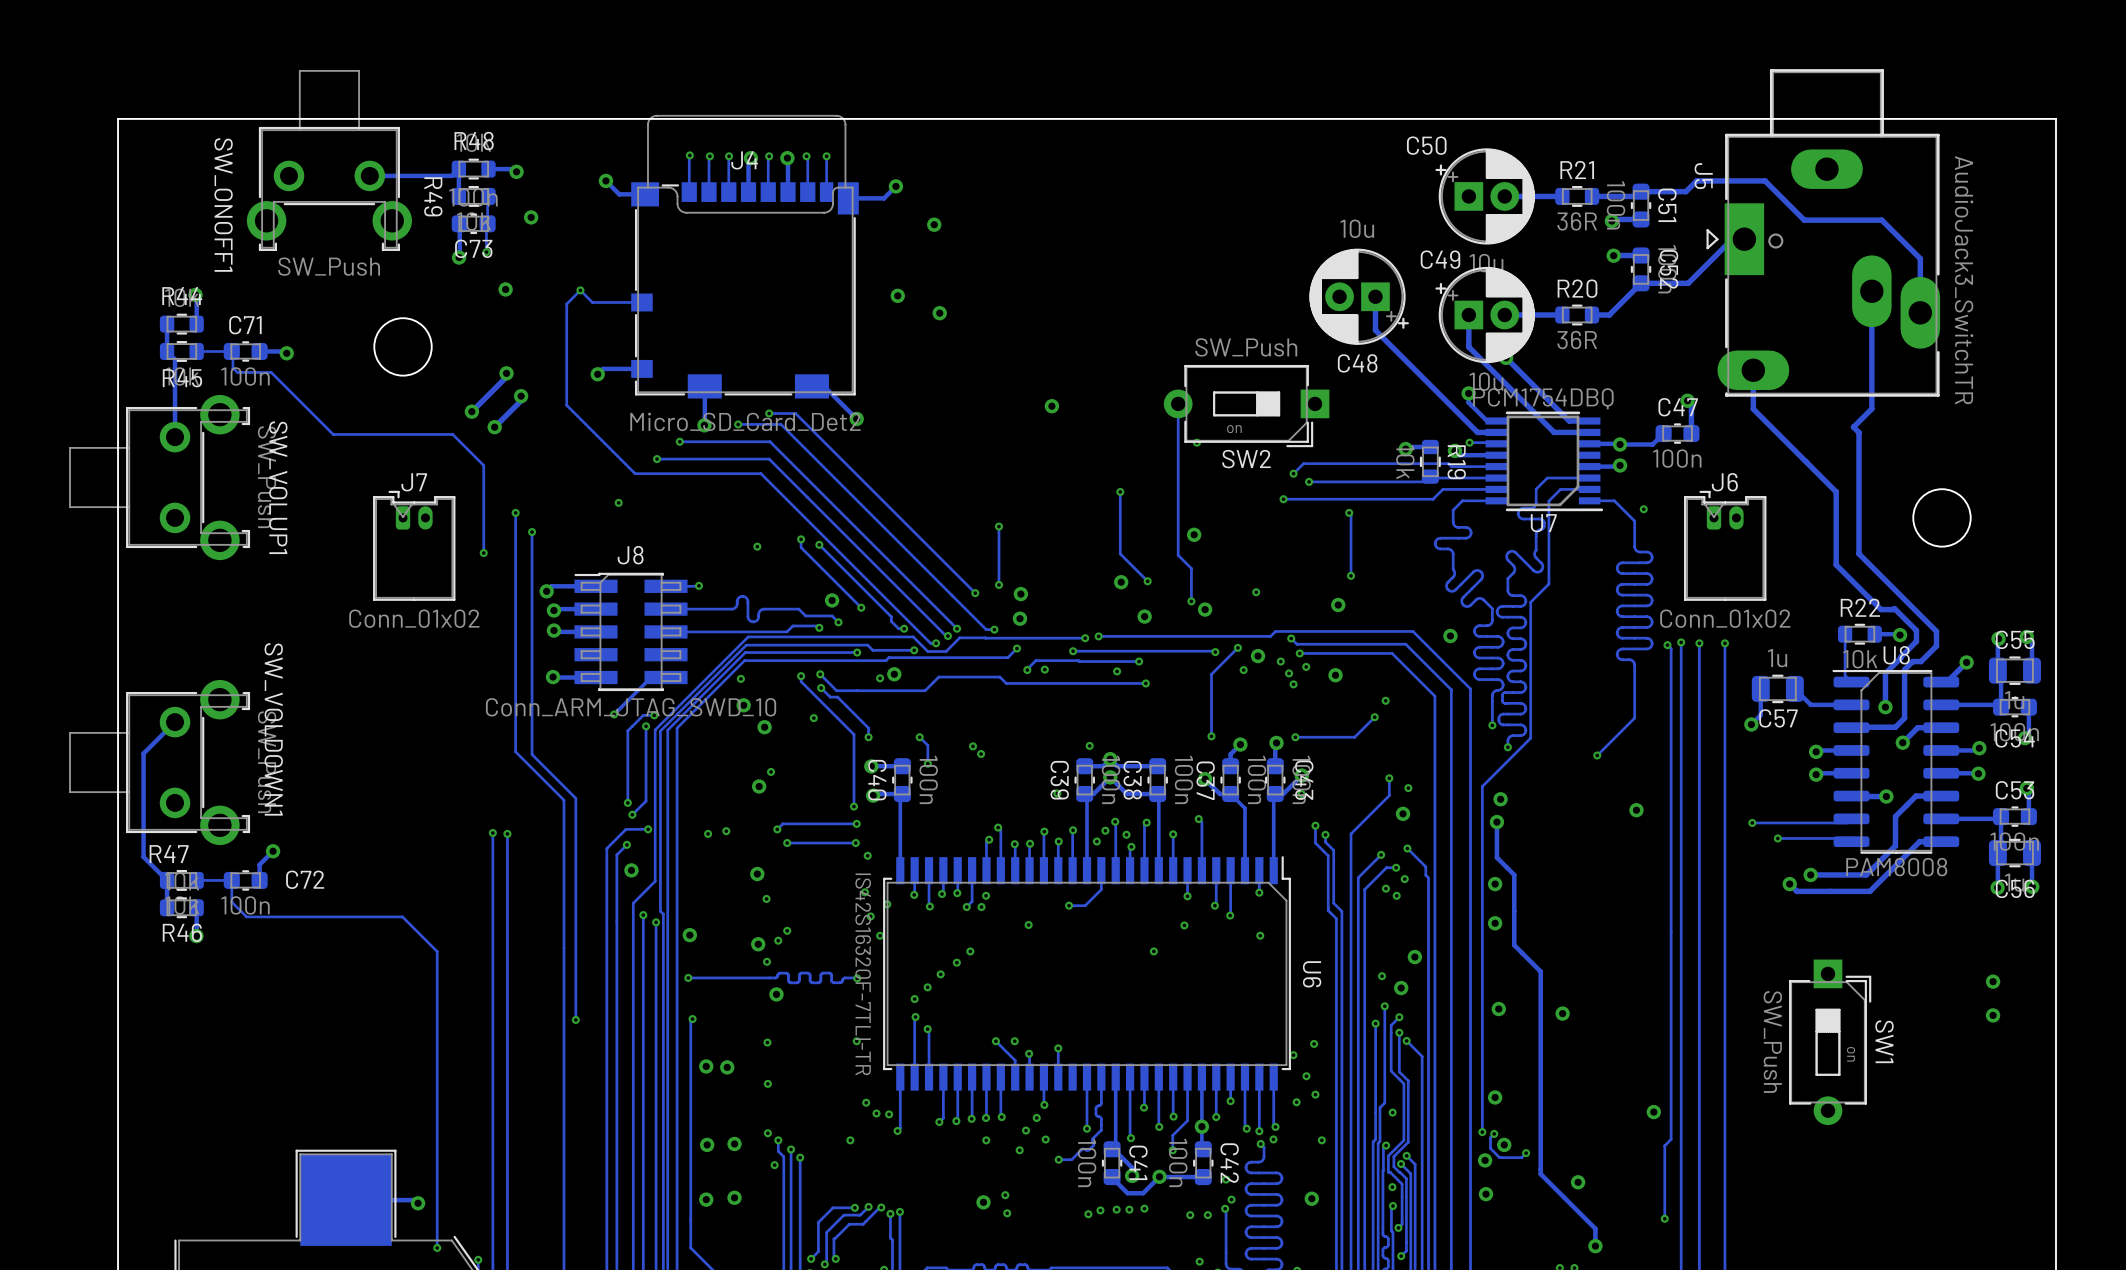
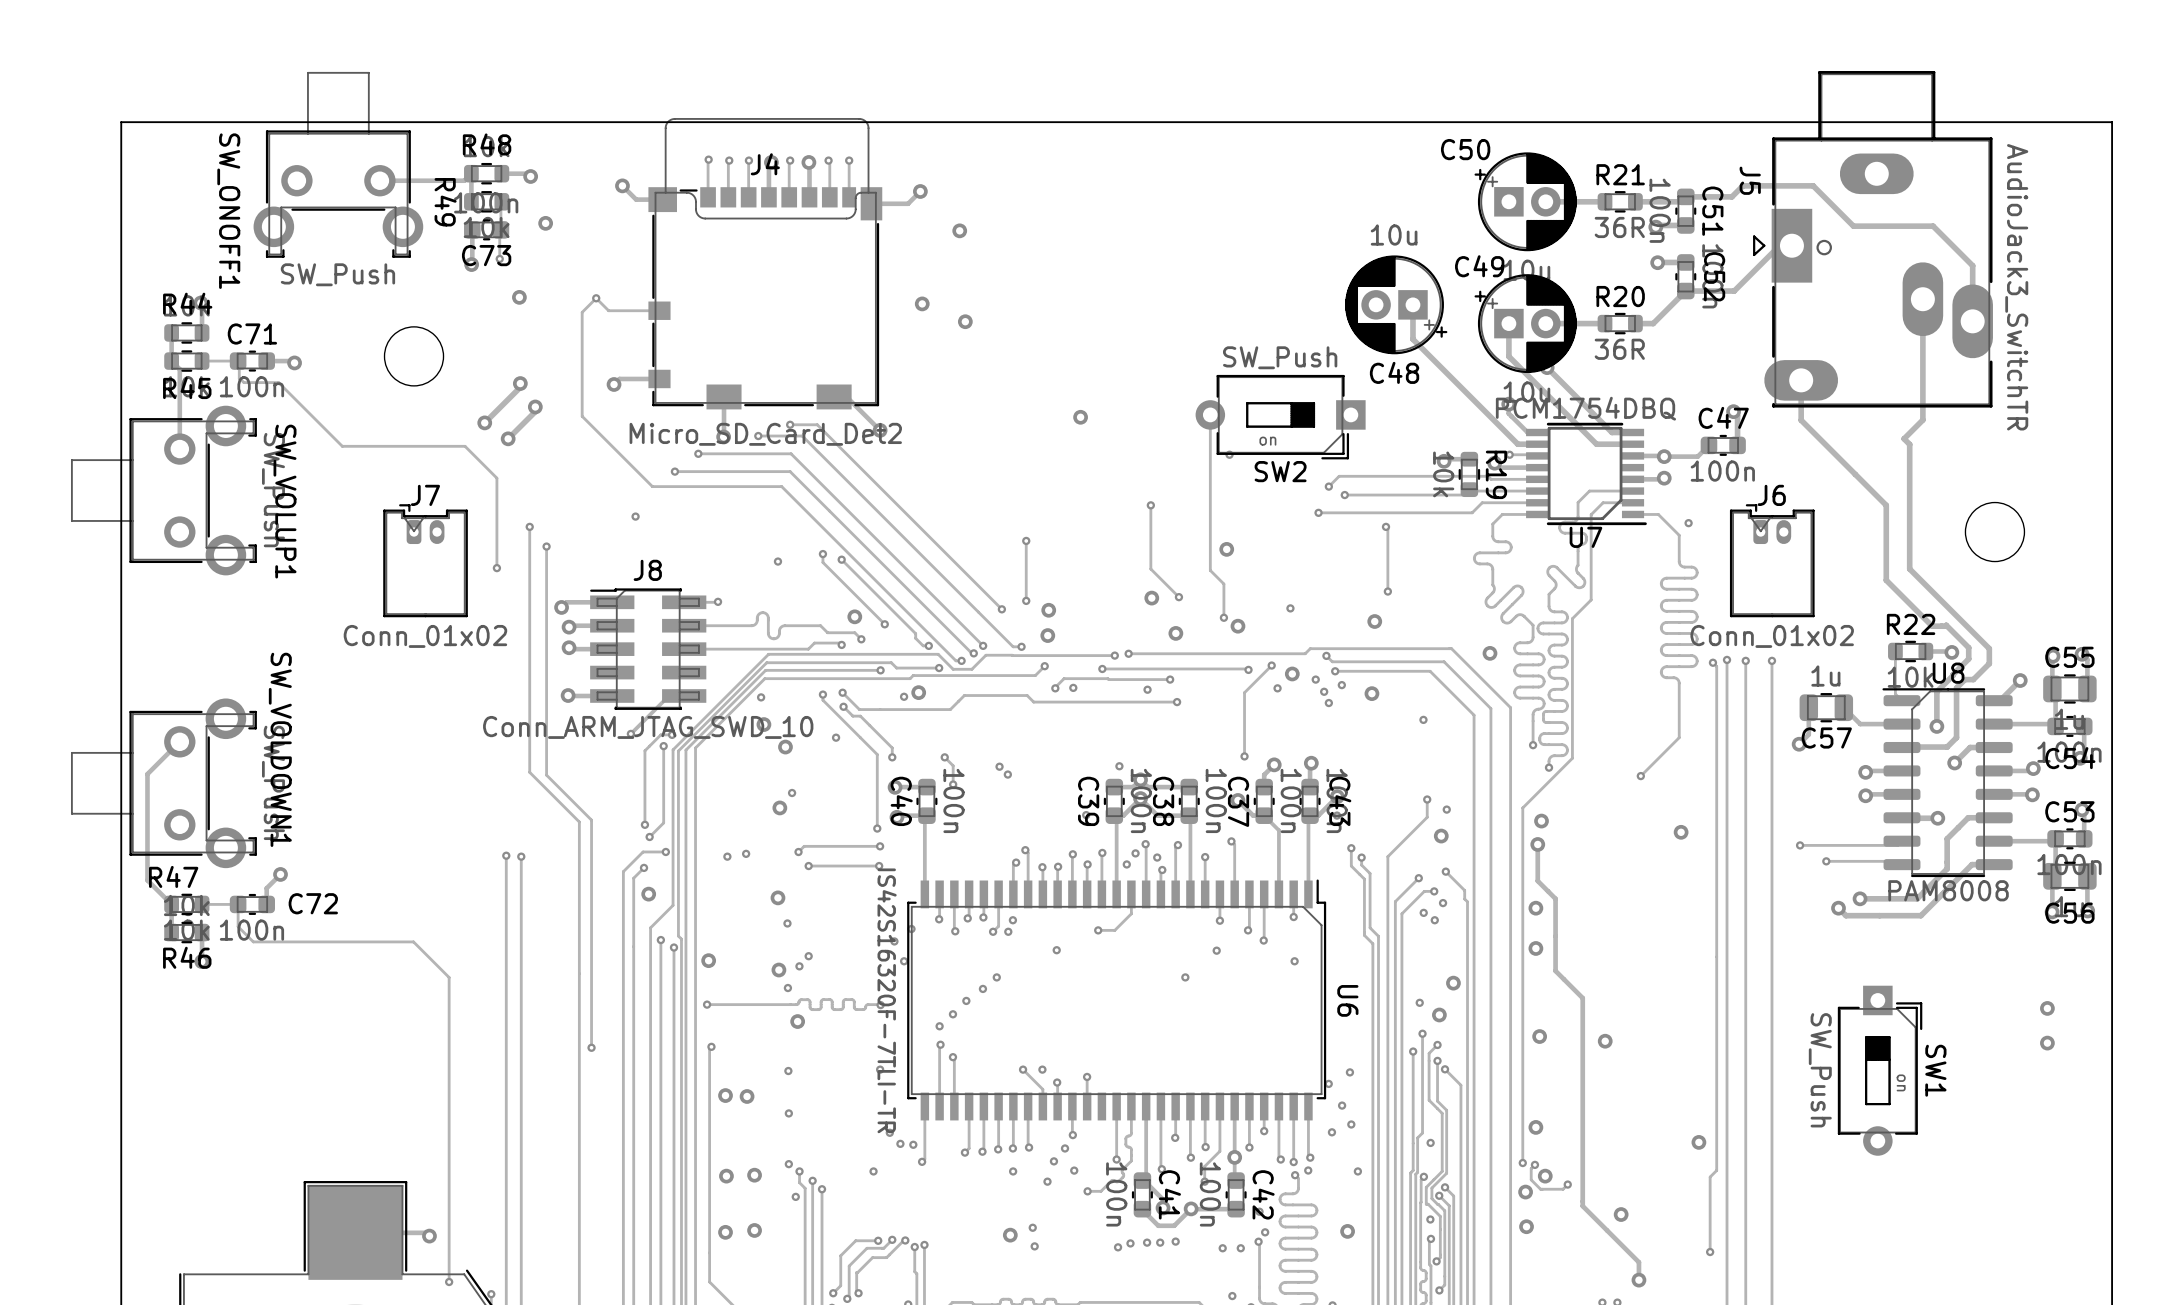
track: (1374, 717) (1354, 737) (1295, 737) -> none
via: (1374, 717) -> none
via: (1295, 737) -> none
via: (867, 855) -> none
via: (864, 892) -> none

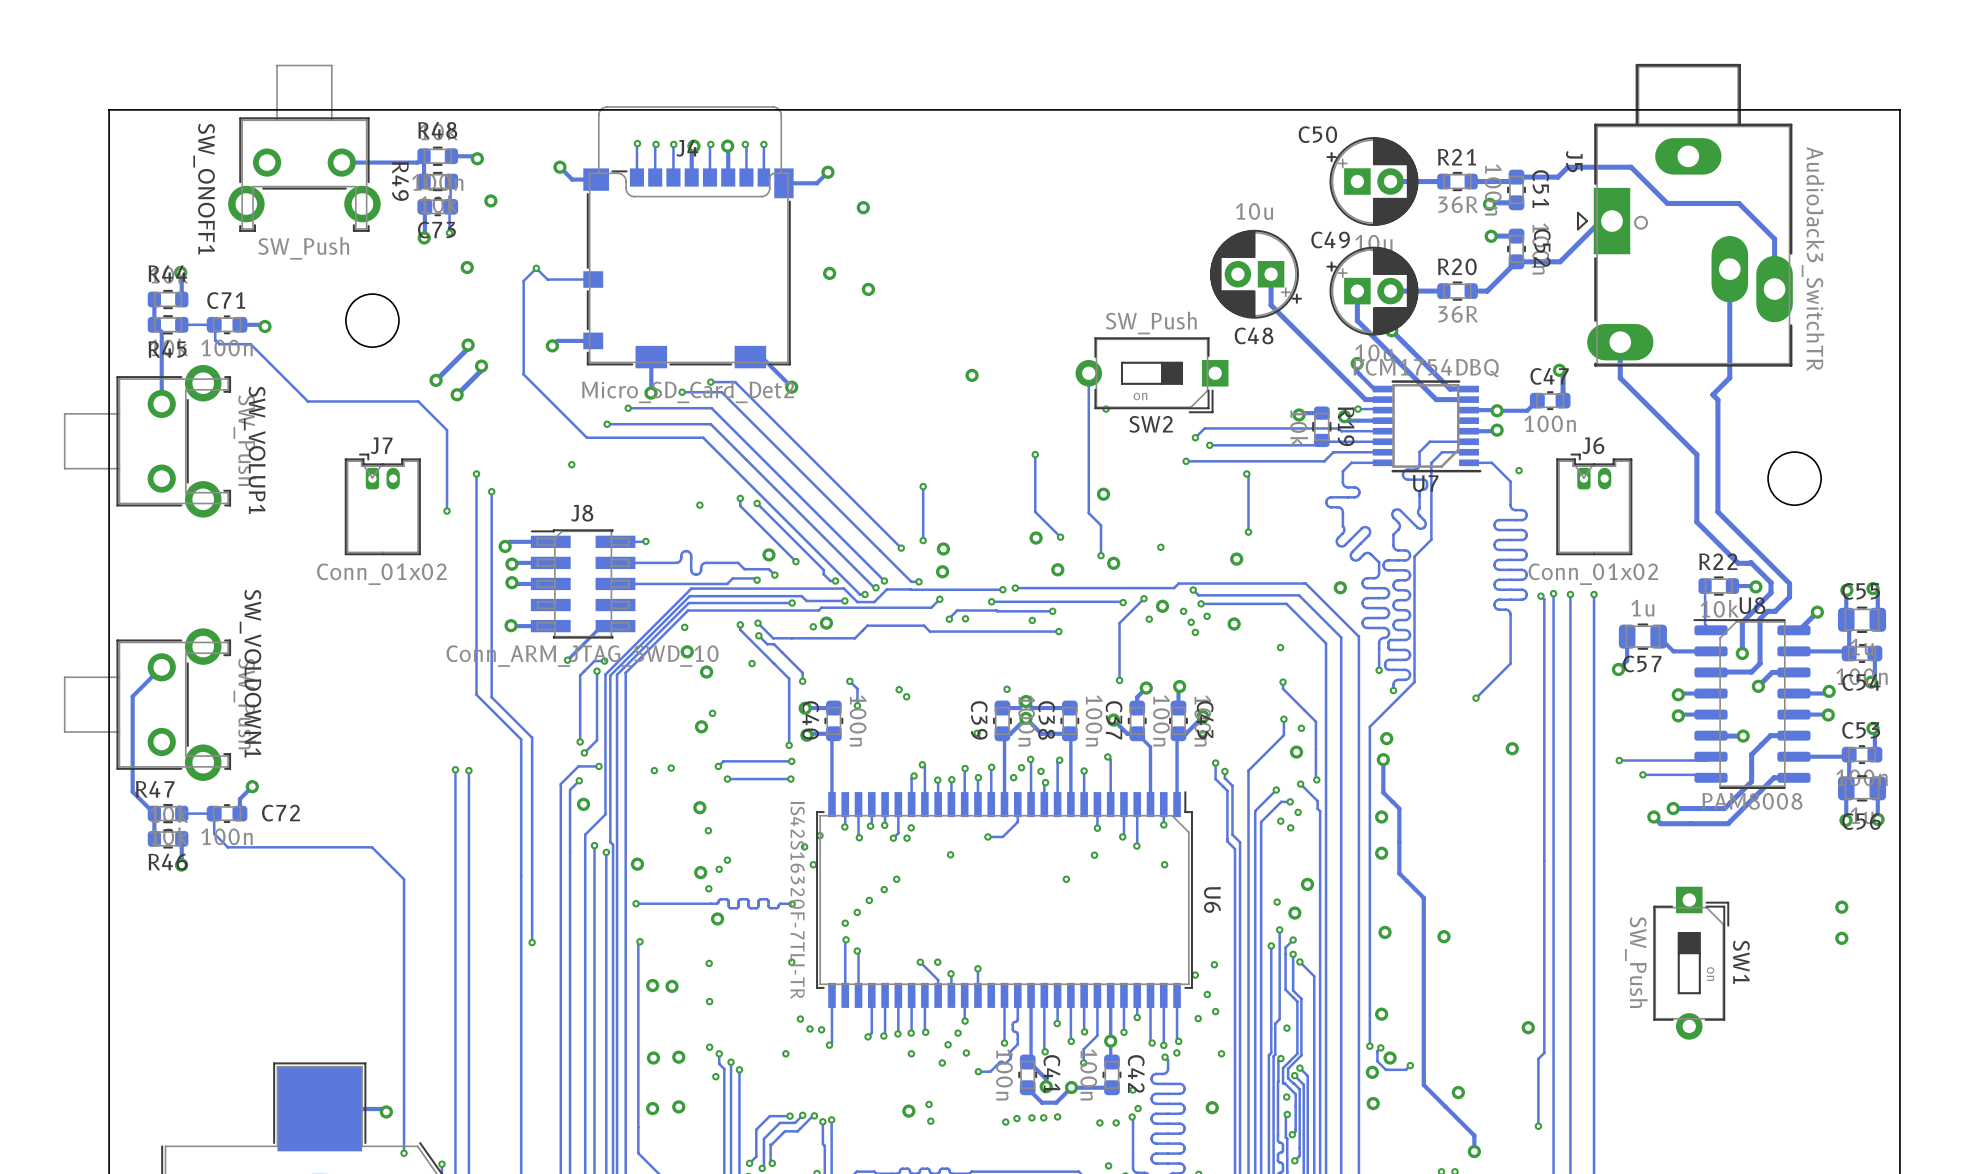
track: none -> (1283, 682) (1283, 688) (1315, 721) (1316, 779)
via: none -> (1283, 682)
via: none -> (1316, 779)

